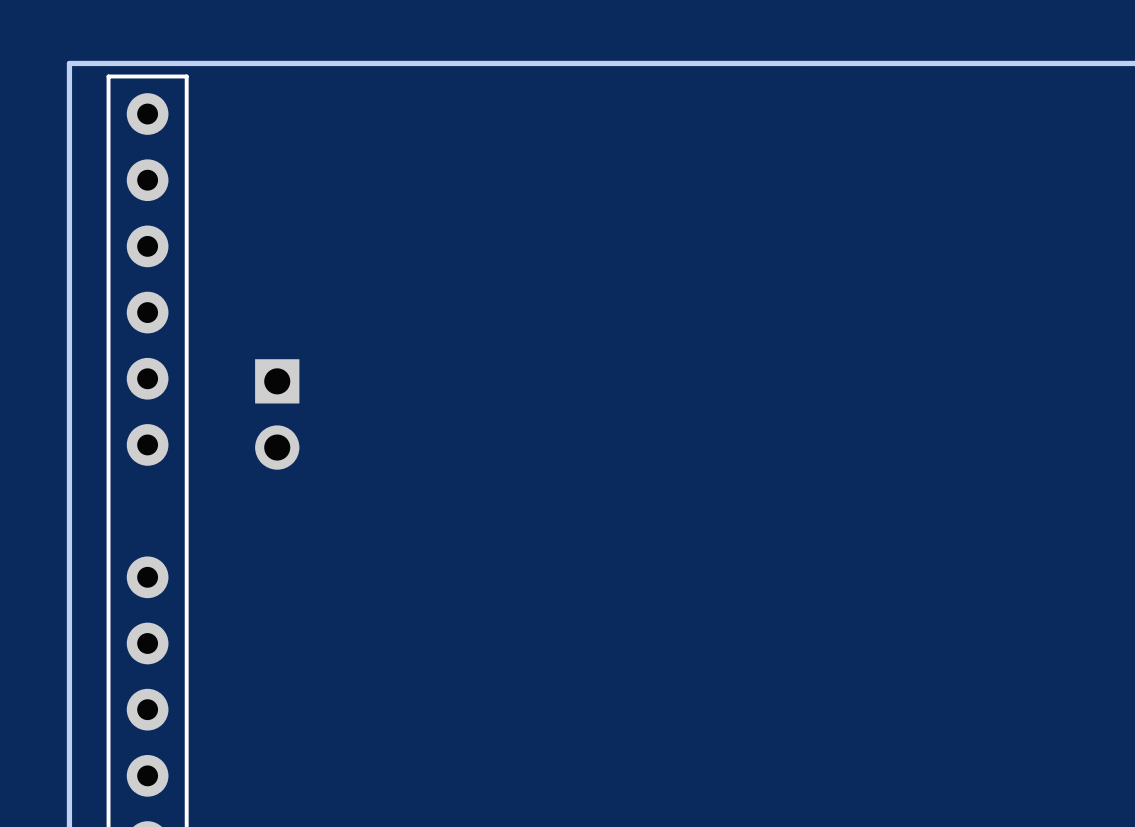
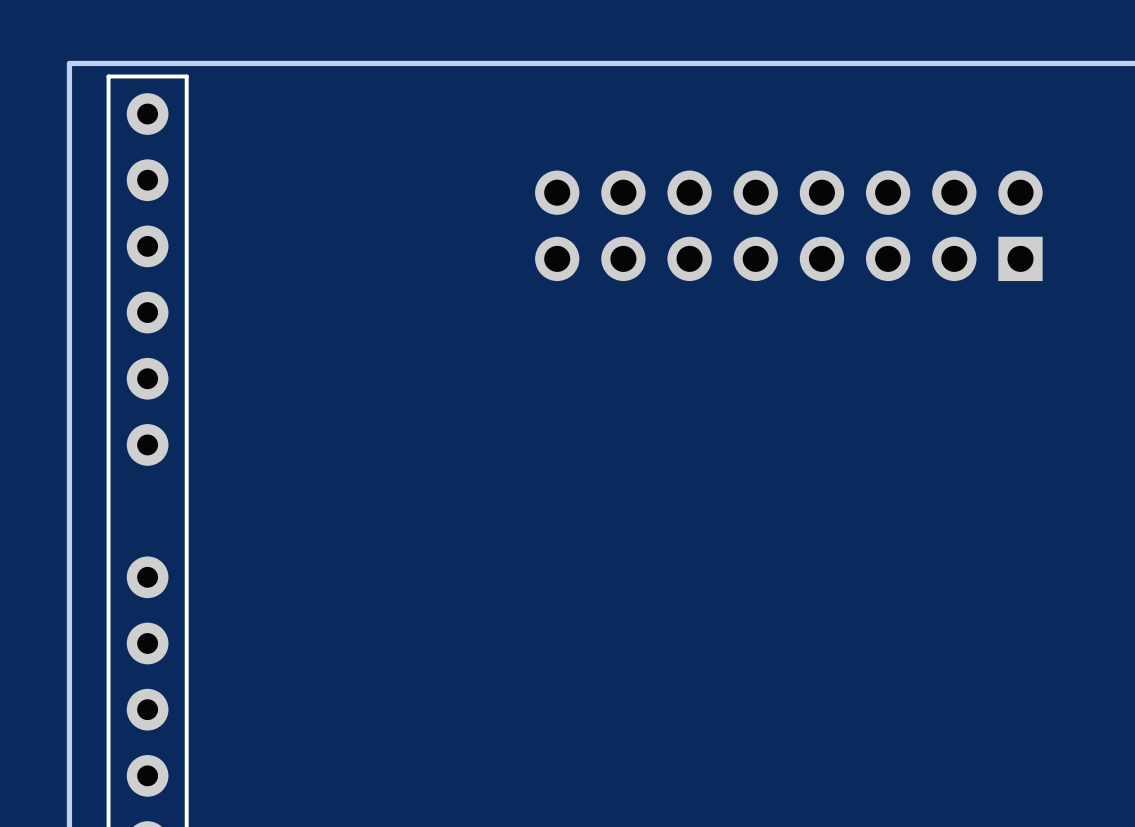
part: none -> (788, 225)
part: (277, 414) -> none

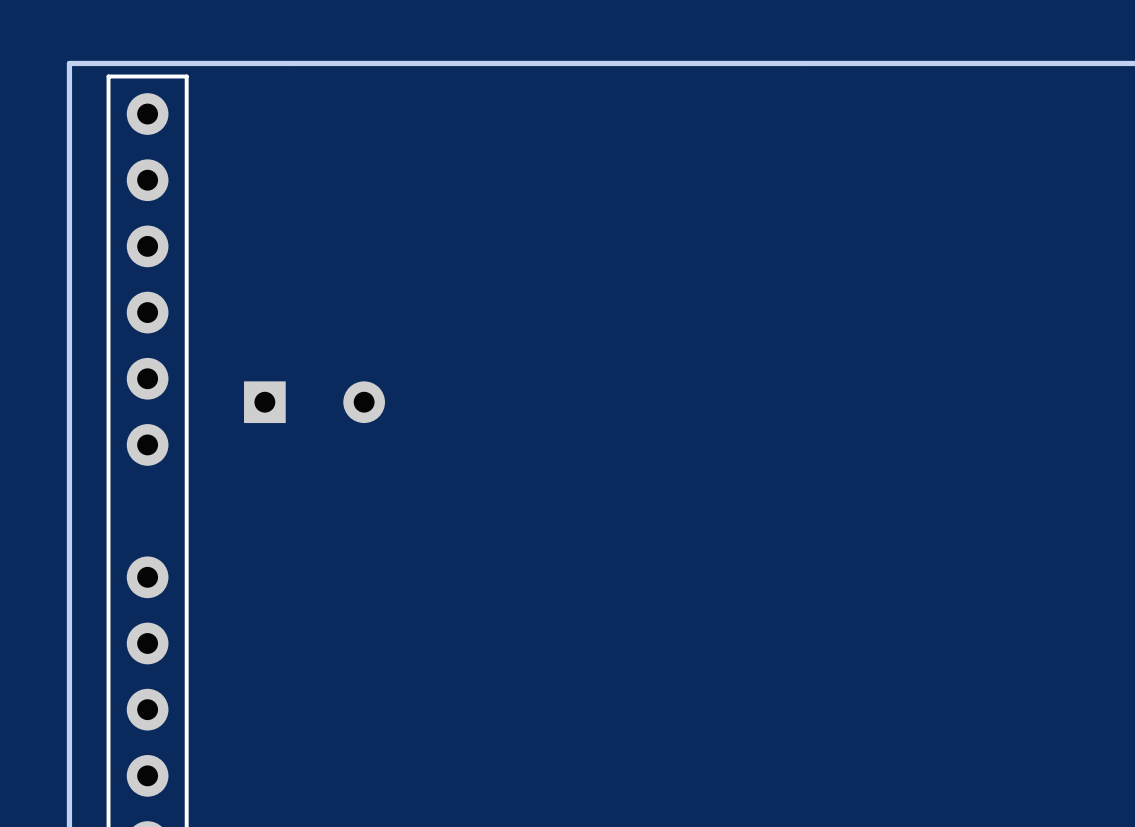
part: (788, 225) -> none
part: none -> (314, 402)

